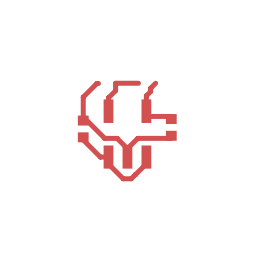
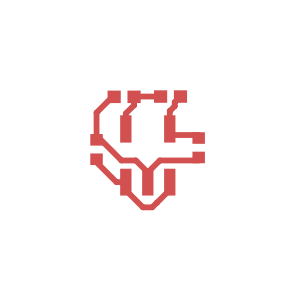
part: none -> (124, 96)
part: none -> (170, 96)

